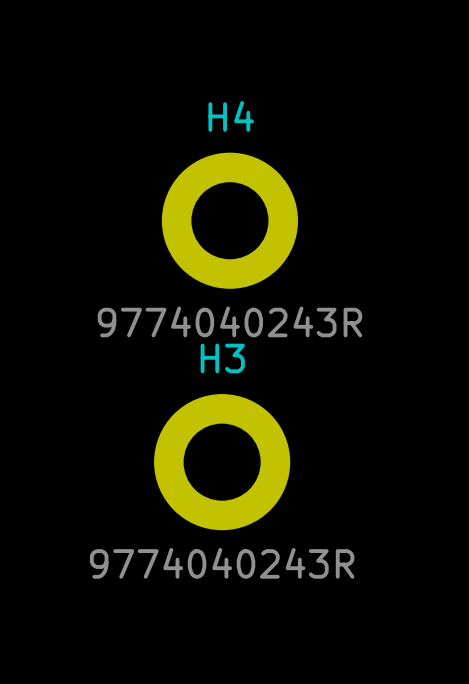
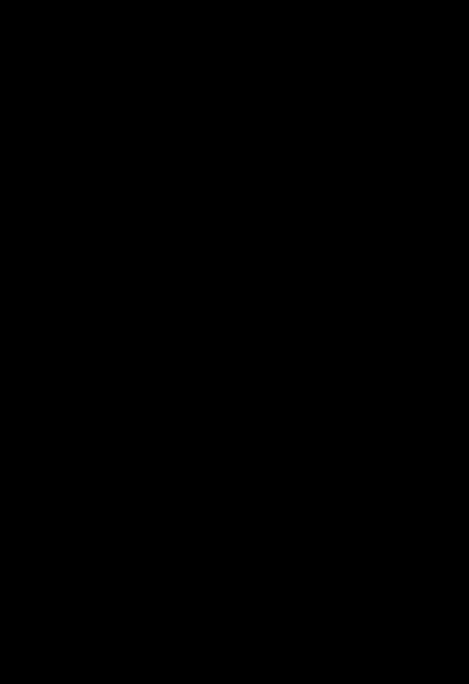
H4: 9774040243R (229, 220) -> none
H3: 9774040243R (222, 462) -> none

